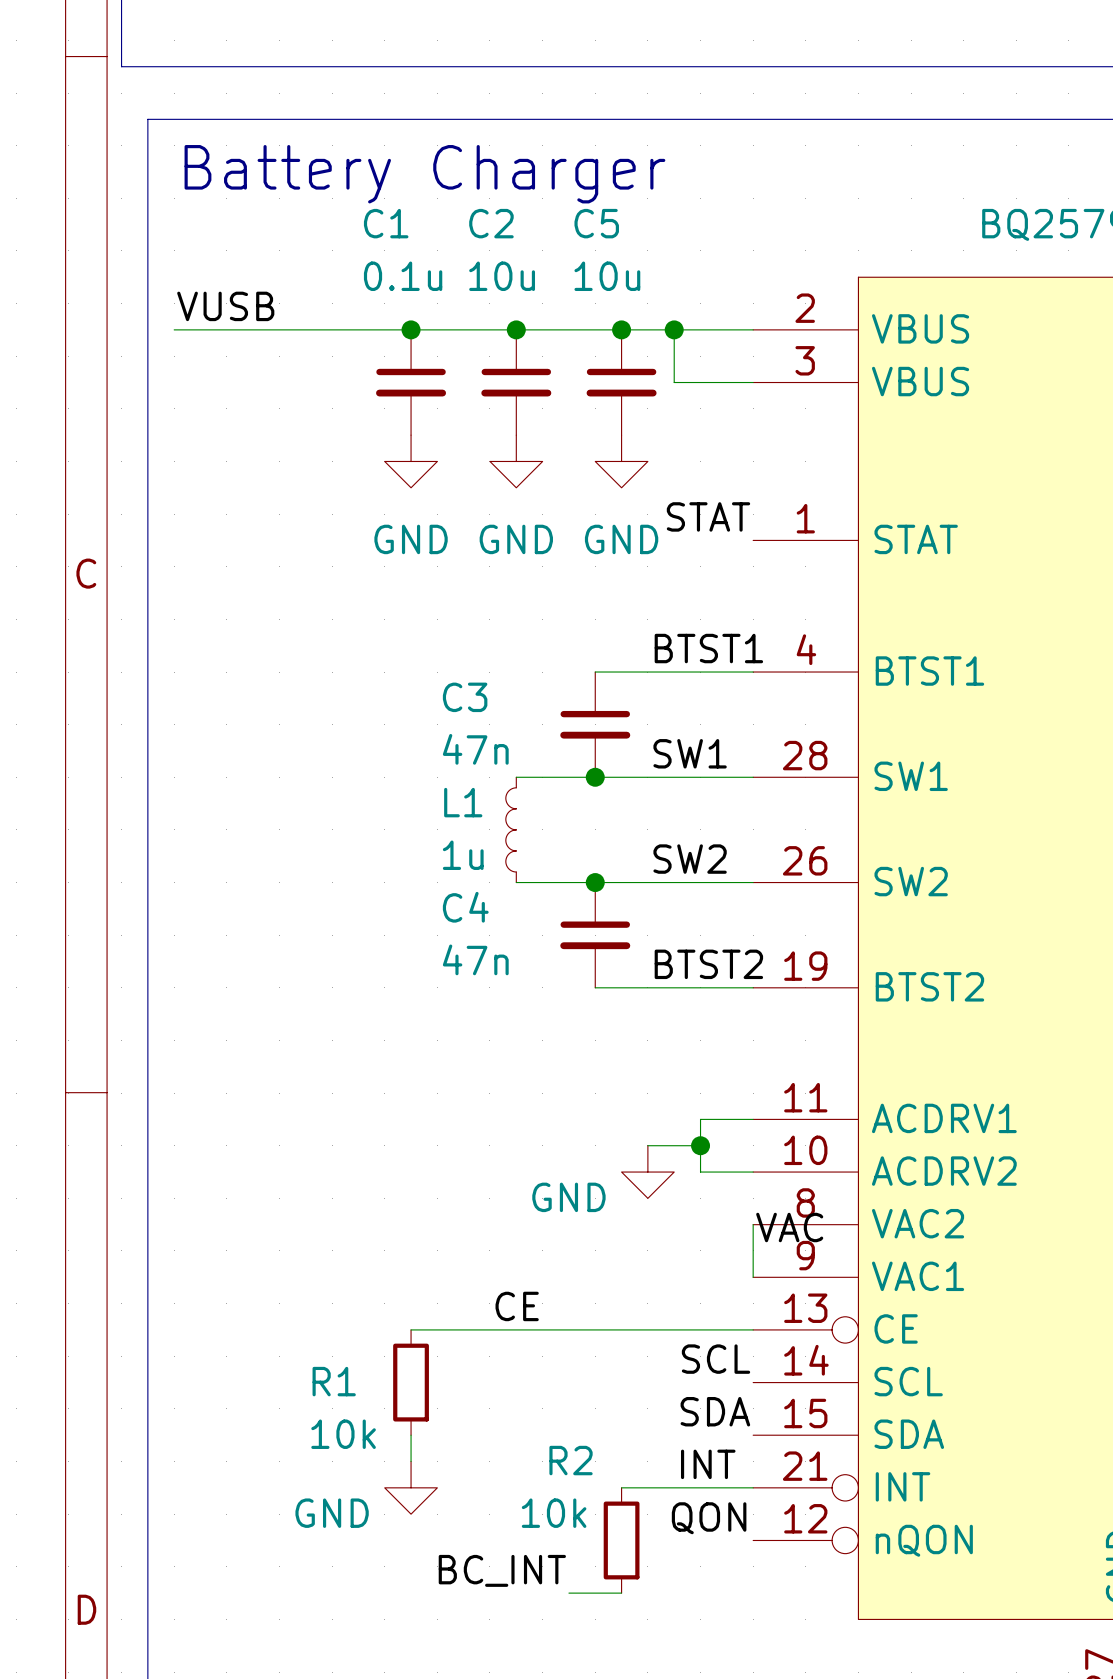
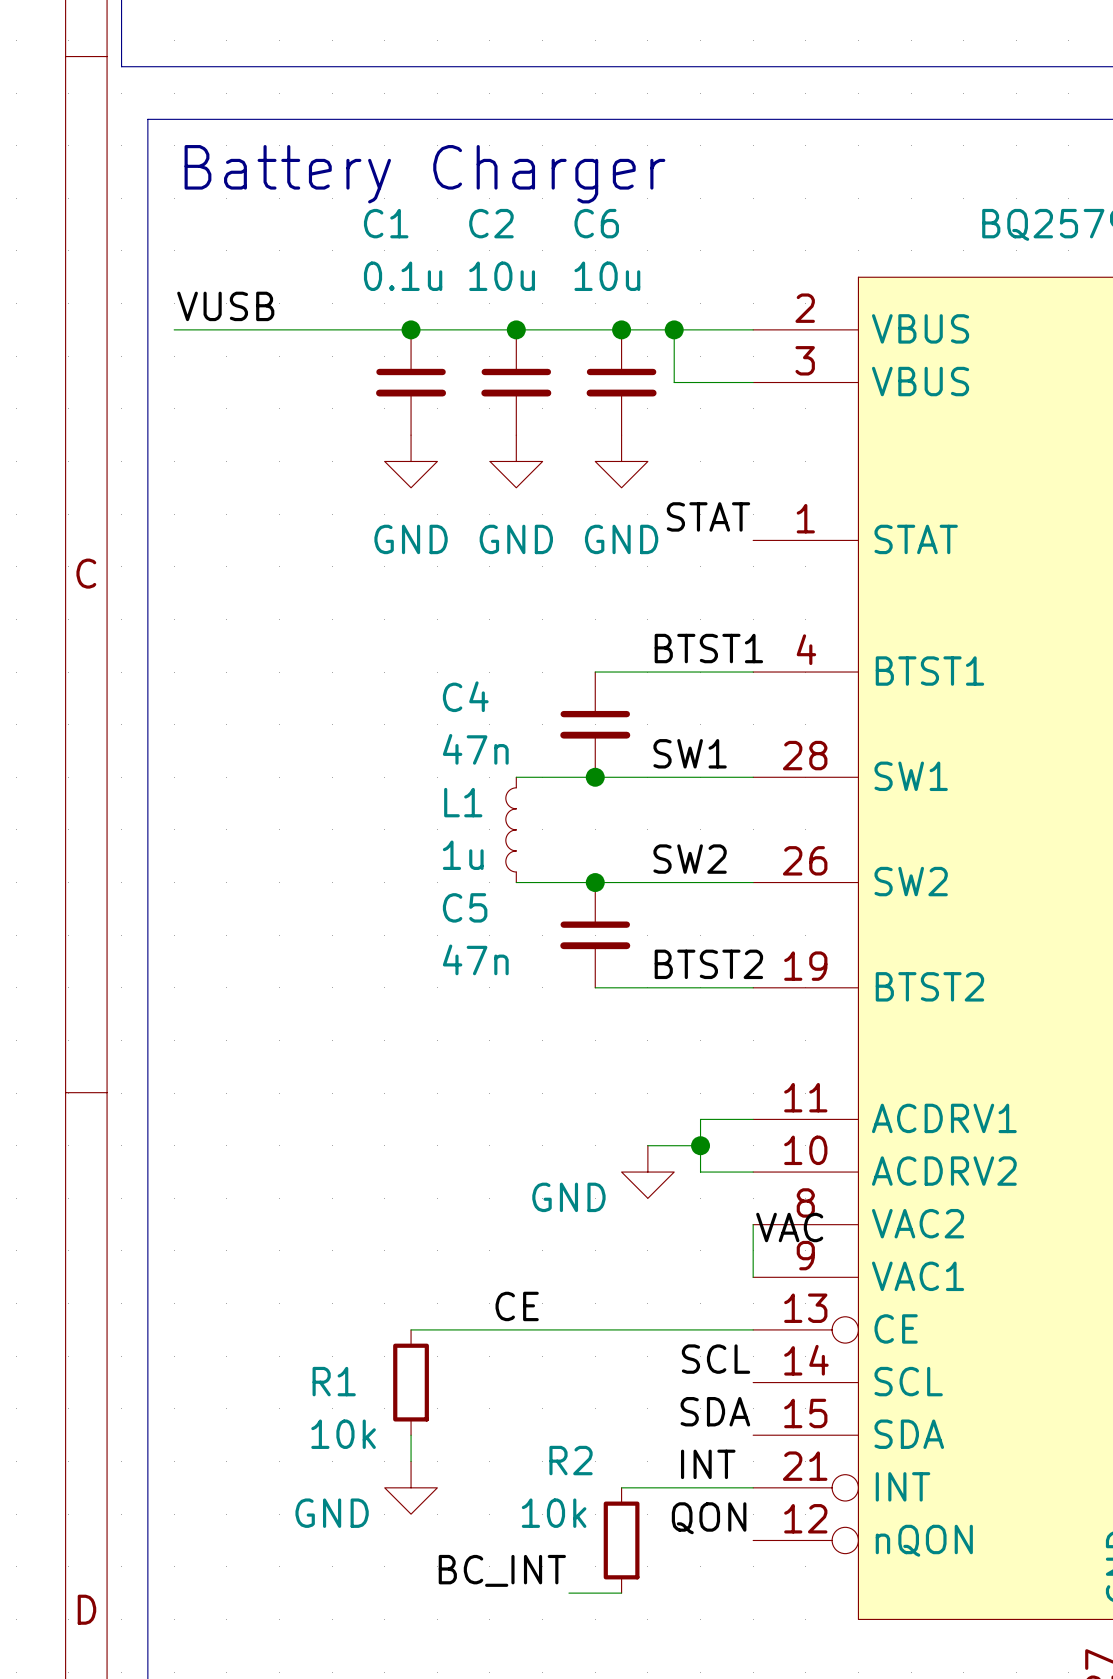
C5 name: C5 (596, 223) -> C6 (596, 223)
C3 name: C3 (465, 697) -> C4 (465, 696)
C4 name: C4 (465, 907) -> C5 (465, 907)

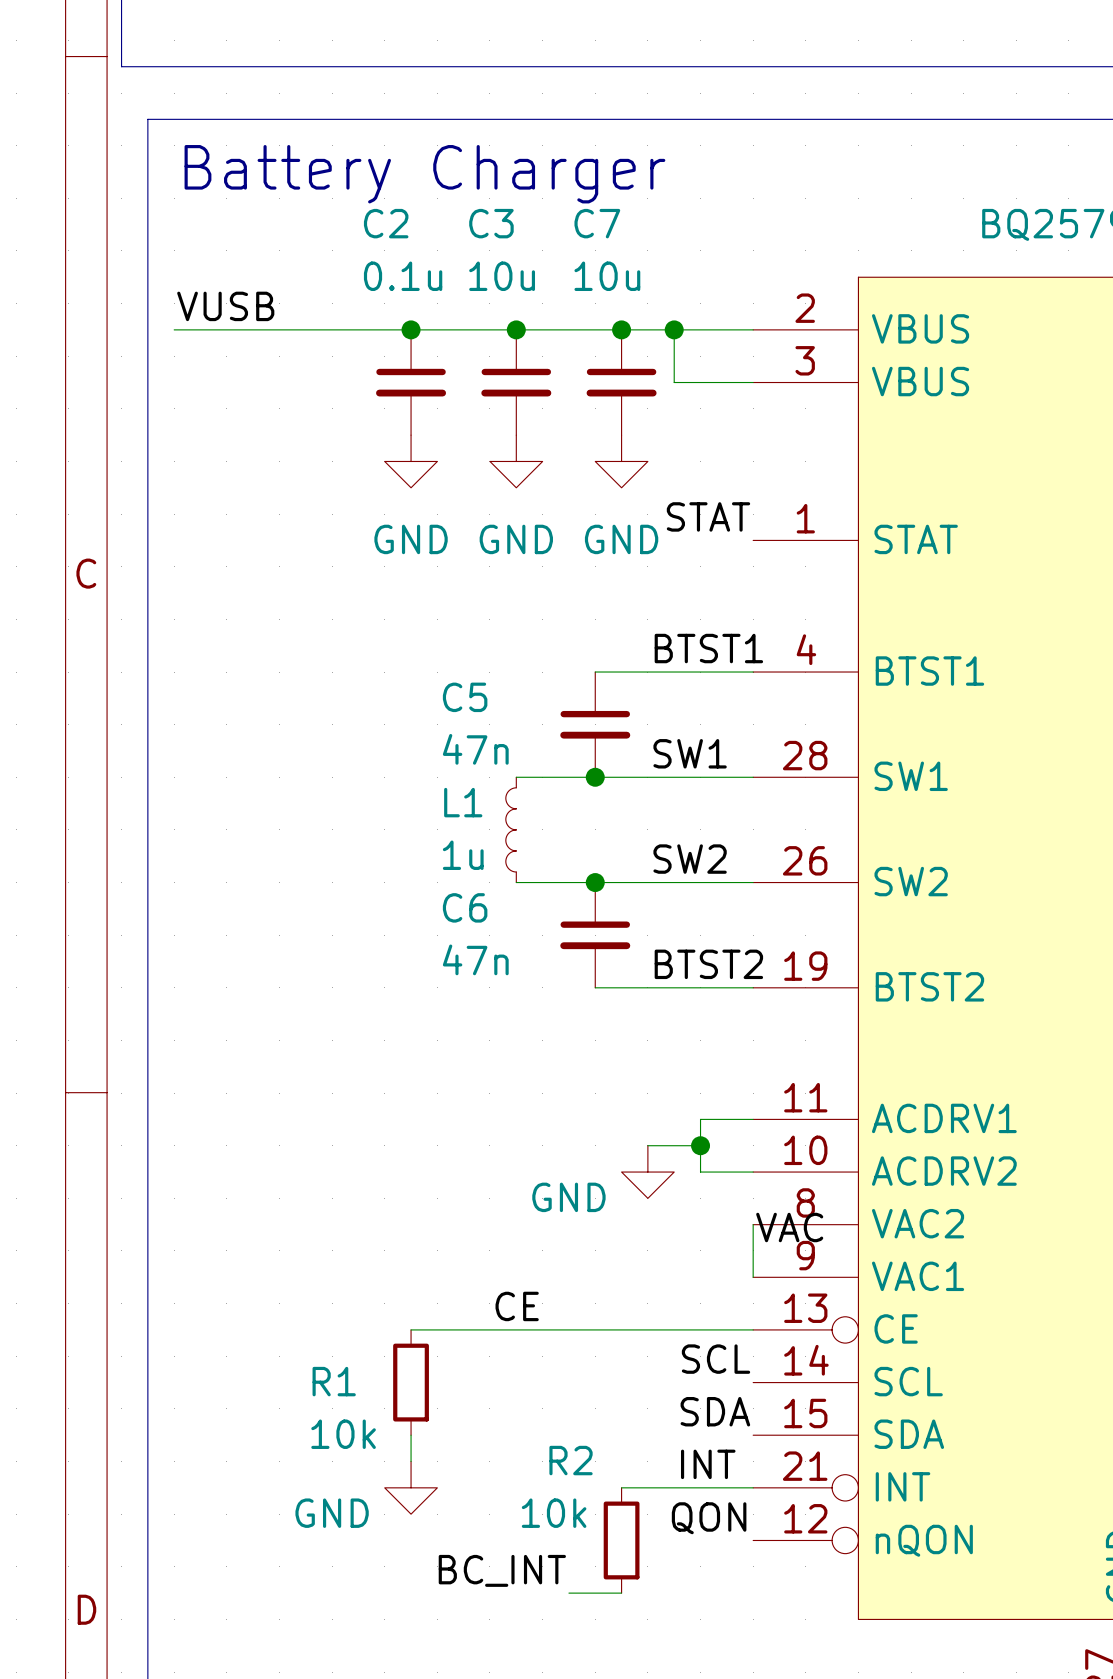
C1 name: C1 (386, 223) -> C2 (386, 223)
C2 name: C2 (491, 223) -> C3 (491, 223)
C6 name: C6 (596, 223) -> C7 (597, 223)
C4 name: C4 (465, 696) -> C5 (465, 697)
C5 name: C5 (465, 907) -> C6 (465, 907)

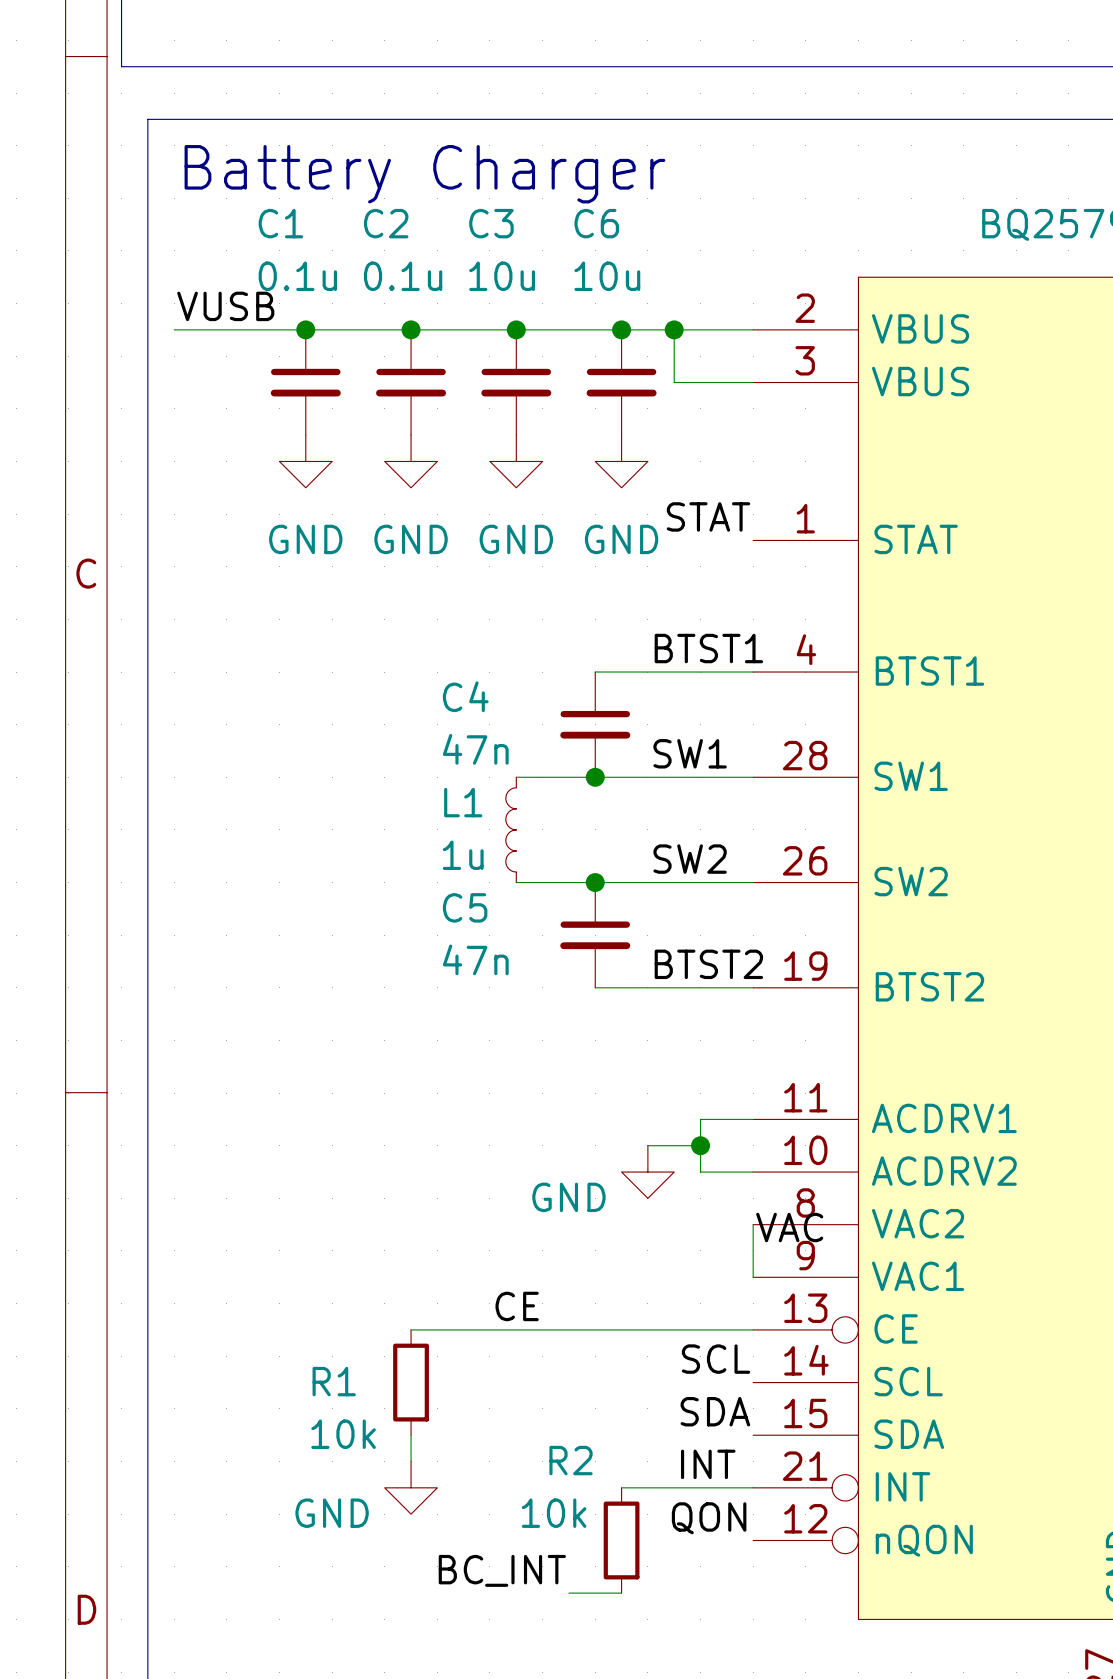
C7 name: C7 (597, 223) -> C6 (596, 223)
junction: none -> (305, 329)
C1: none -> 0.1u (305, 382)
power symbol: none -> GND (305, 461)
C5 name: C5 (465, 697) -> C4 (465, 696)
C6 name: C6 (465, 907) -> C5 (465, 907)

